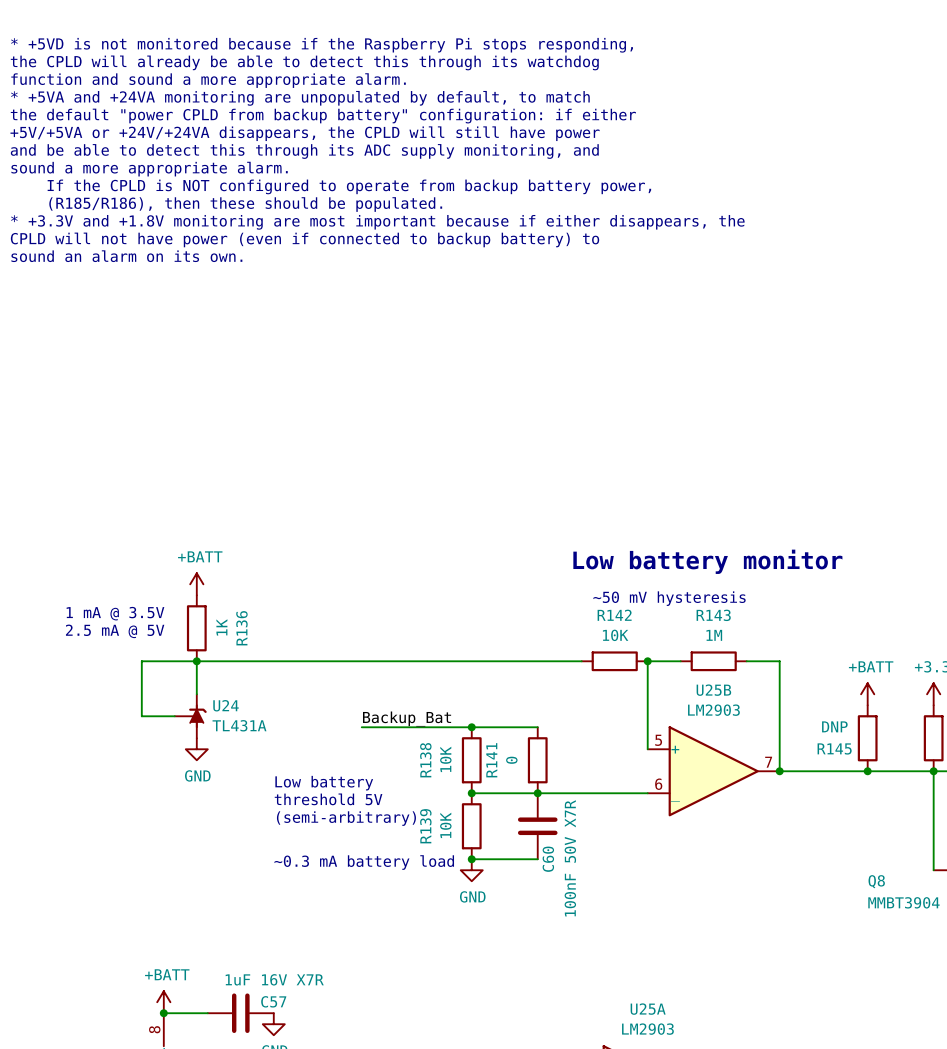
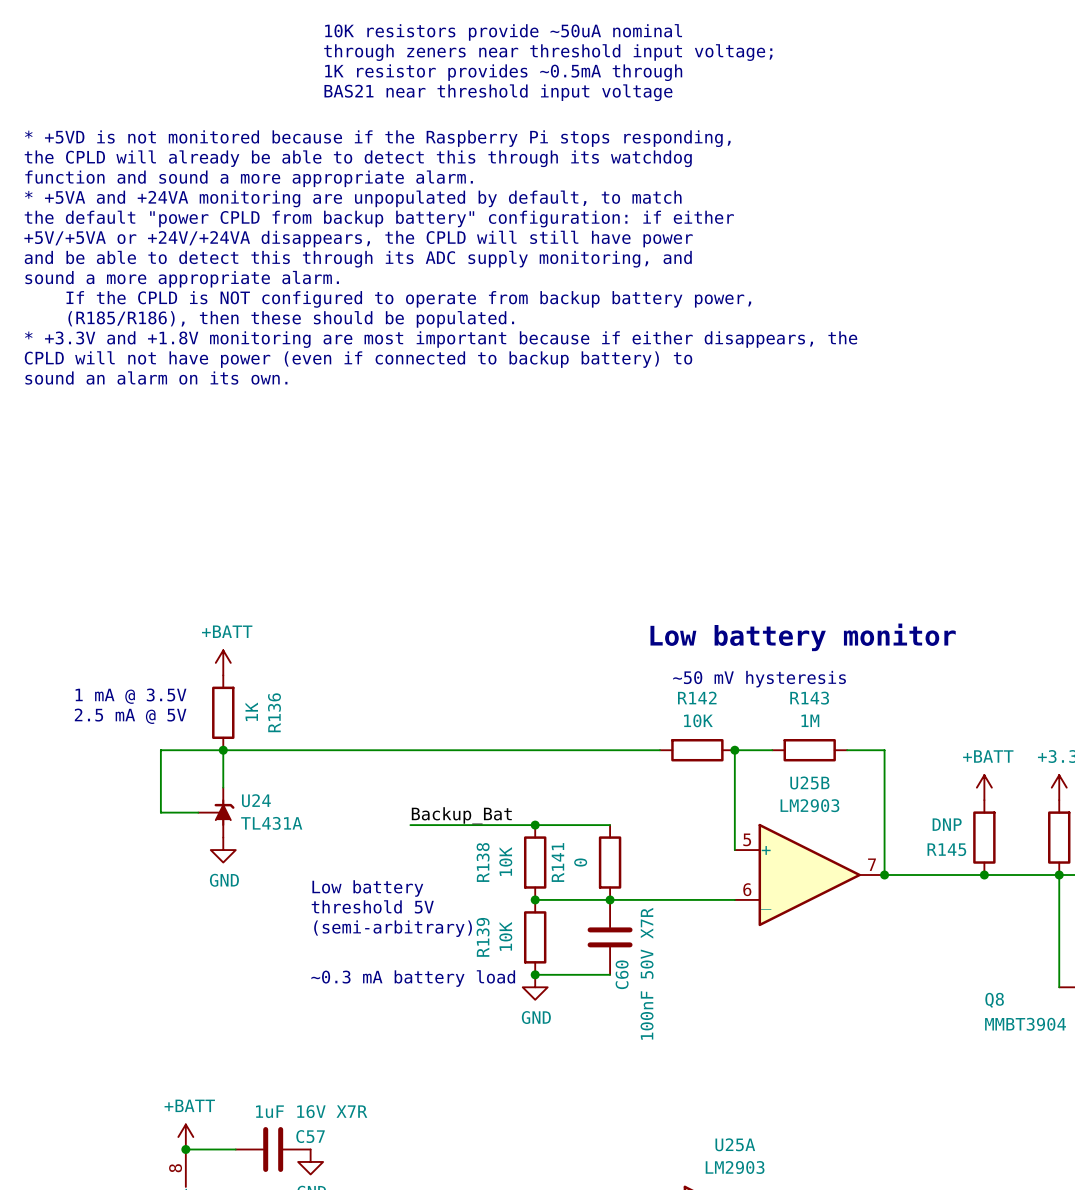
text: none -> 10K resistors provide ~50uA nominal (503, 32)
text position: * +5VD is not monitored because if the Raspberry Pi stops responding, (322, 45) -> * +5VD is not monitored because if the Raspberry Pi stops responding, (377, 138)
text: none -> through zeners near threshold input voltage; (548, 52)
text position: the CPLD will already be able to detect this through its watchdog (304, 62) -> the CPLD will already be able to detect this through its watchdog (358, 158)
text: none -> 1K resistor provides ~0.5mA through (503, 72)
text position: function and sound a more appropriate alarm. (208, 80) -> function and sound a more appropriate alarm. (249, 178)
text: none -> BAS21 near threshold input voltage (498, 92)
text position: * +5VA and +24VA monitoring are unpopulated by default, to match (300, 98) -> * +5VA and +24VA monitoring are unpopulated by default, to match (353, 198)
text position: the default "power CPLD from backup battery" configuration: if either (323, 116) -> the default "power CPLD from backup battery" configuration: if either (379, 219)
text position: +5V/+5VA or +24V/+24VA disappears, the CPLD will still have power (305, 133) -> +5V/+5VA or +24V/+24VA disappears, the CPLD will still have power (358, 239)
text position: and be able to detect this through its ADC supply monitoring, and (304, 151) -> and be able to detect this through its ADC supply monitoring, and (358, 259)
text position: sound a more appropriate alarm. (149, 169) -> sound a more appropriate alarm. (182, 279)
text position: If the CPLD is NOT configured to operate from backup battery power, (349, 186) -> If the CPLD is NOT configured to operate from backup battery power, (408, 299)
text position: (R185/R186), then these should be populated. (245, 204) -> (R185/R186), then these should be populated. (291, 319)
text position: * +3.3V and +1.8V monitoring are most important because if either disappears, the (377, 222) -> * +3.3V and +1.8V monitoring are most important because if either disappears, the (441, 339)
text position: CPLD will not have power (even if connected to backup battery) to (305, 239) -> CPLD will not have power (even if connected to backup battery) to (358, 359)
text position: sound an alarm on its own. (126, 256) -> sound an alarm on its own. (156, 377)

